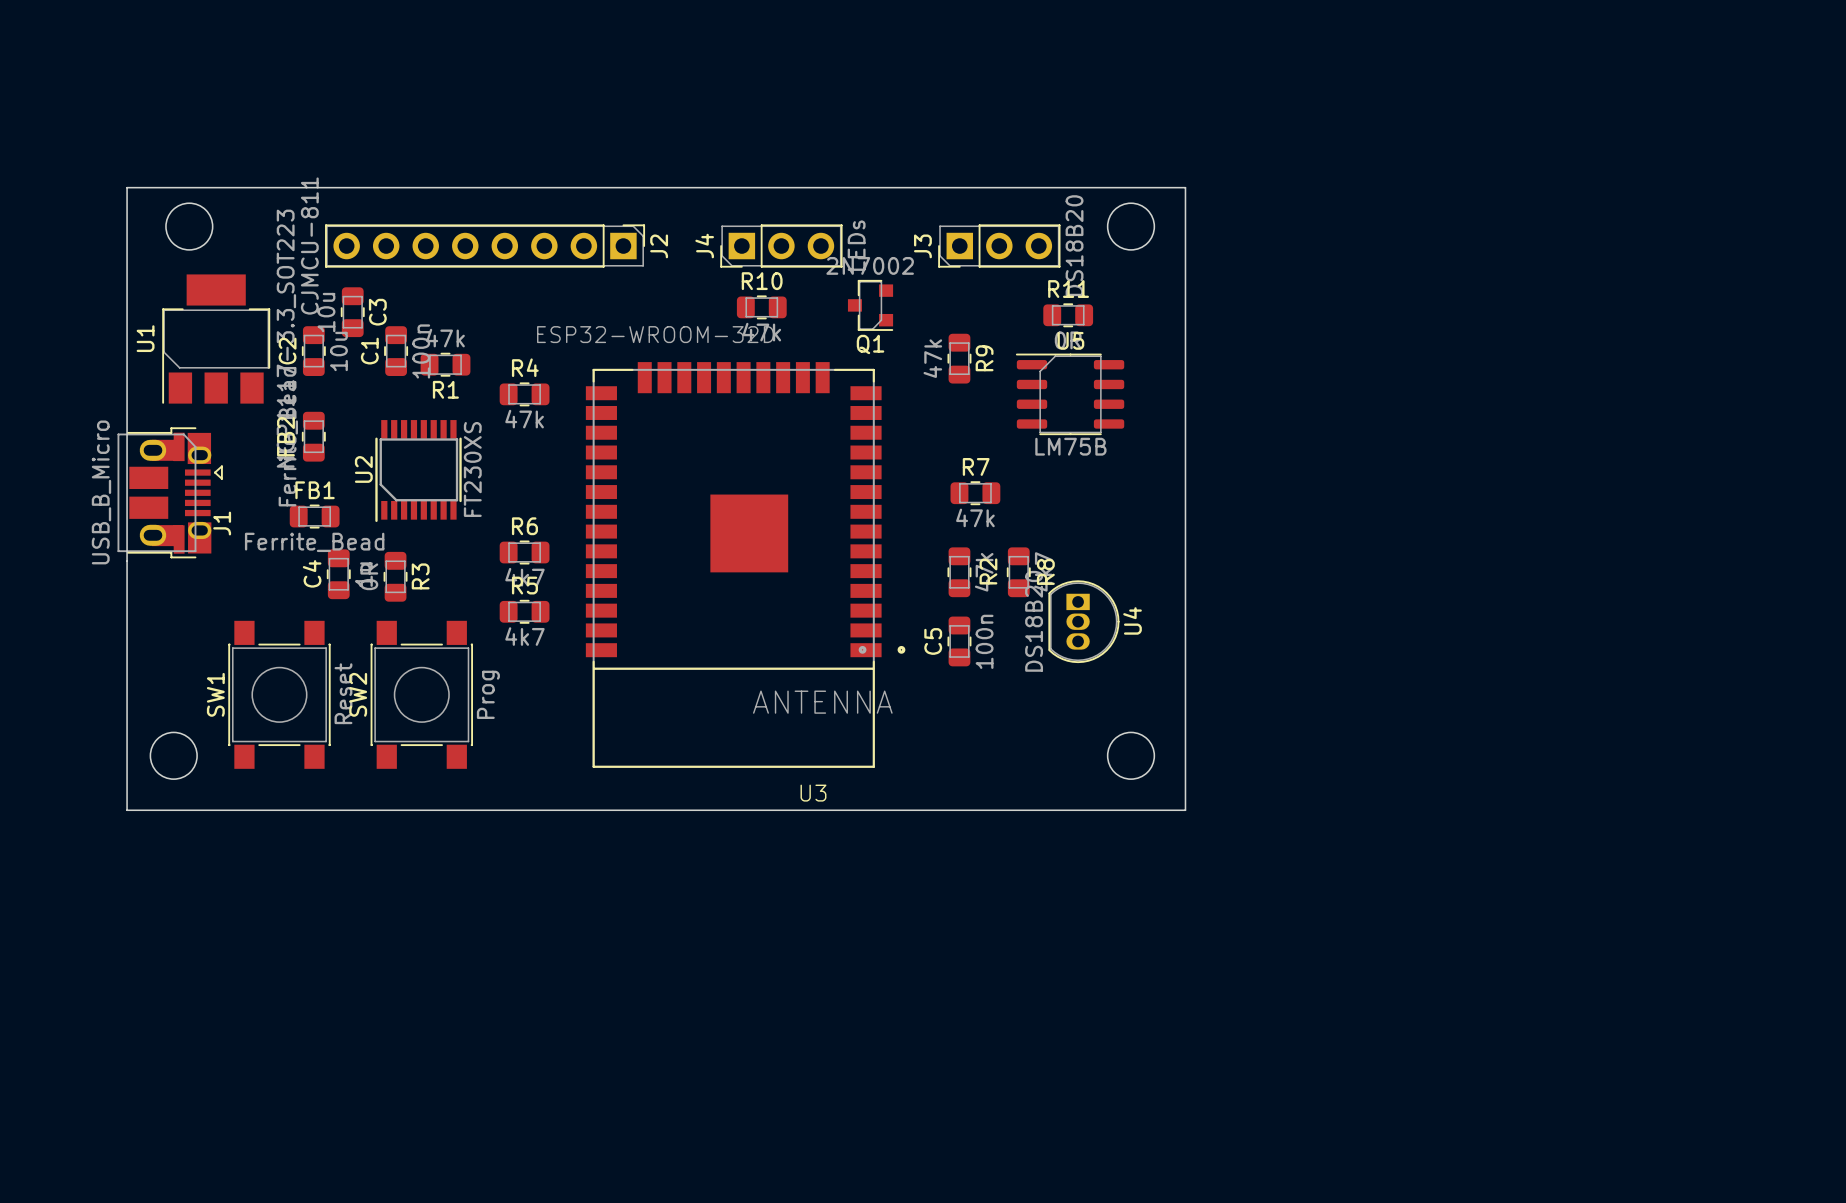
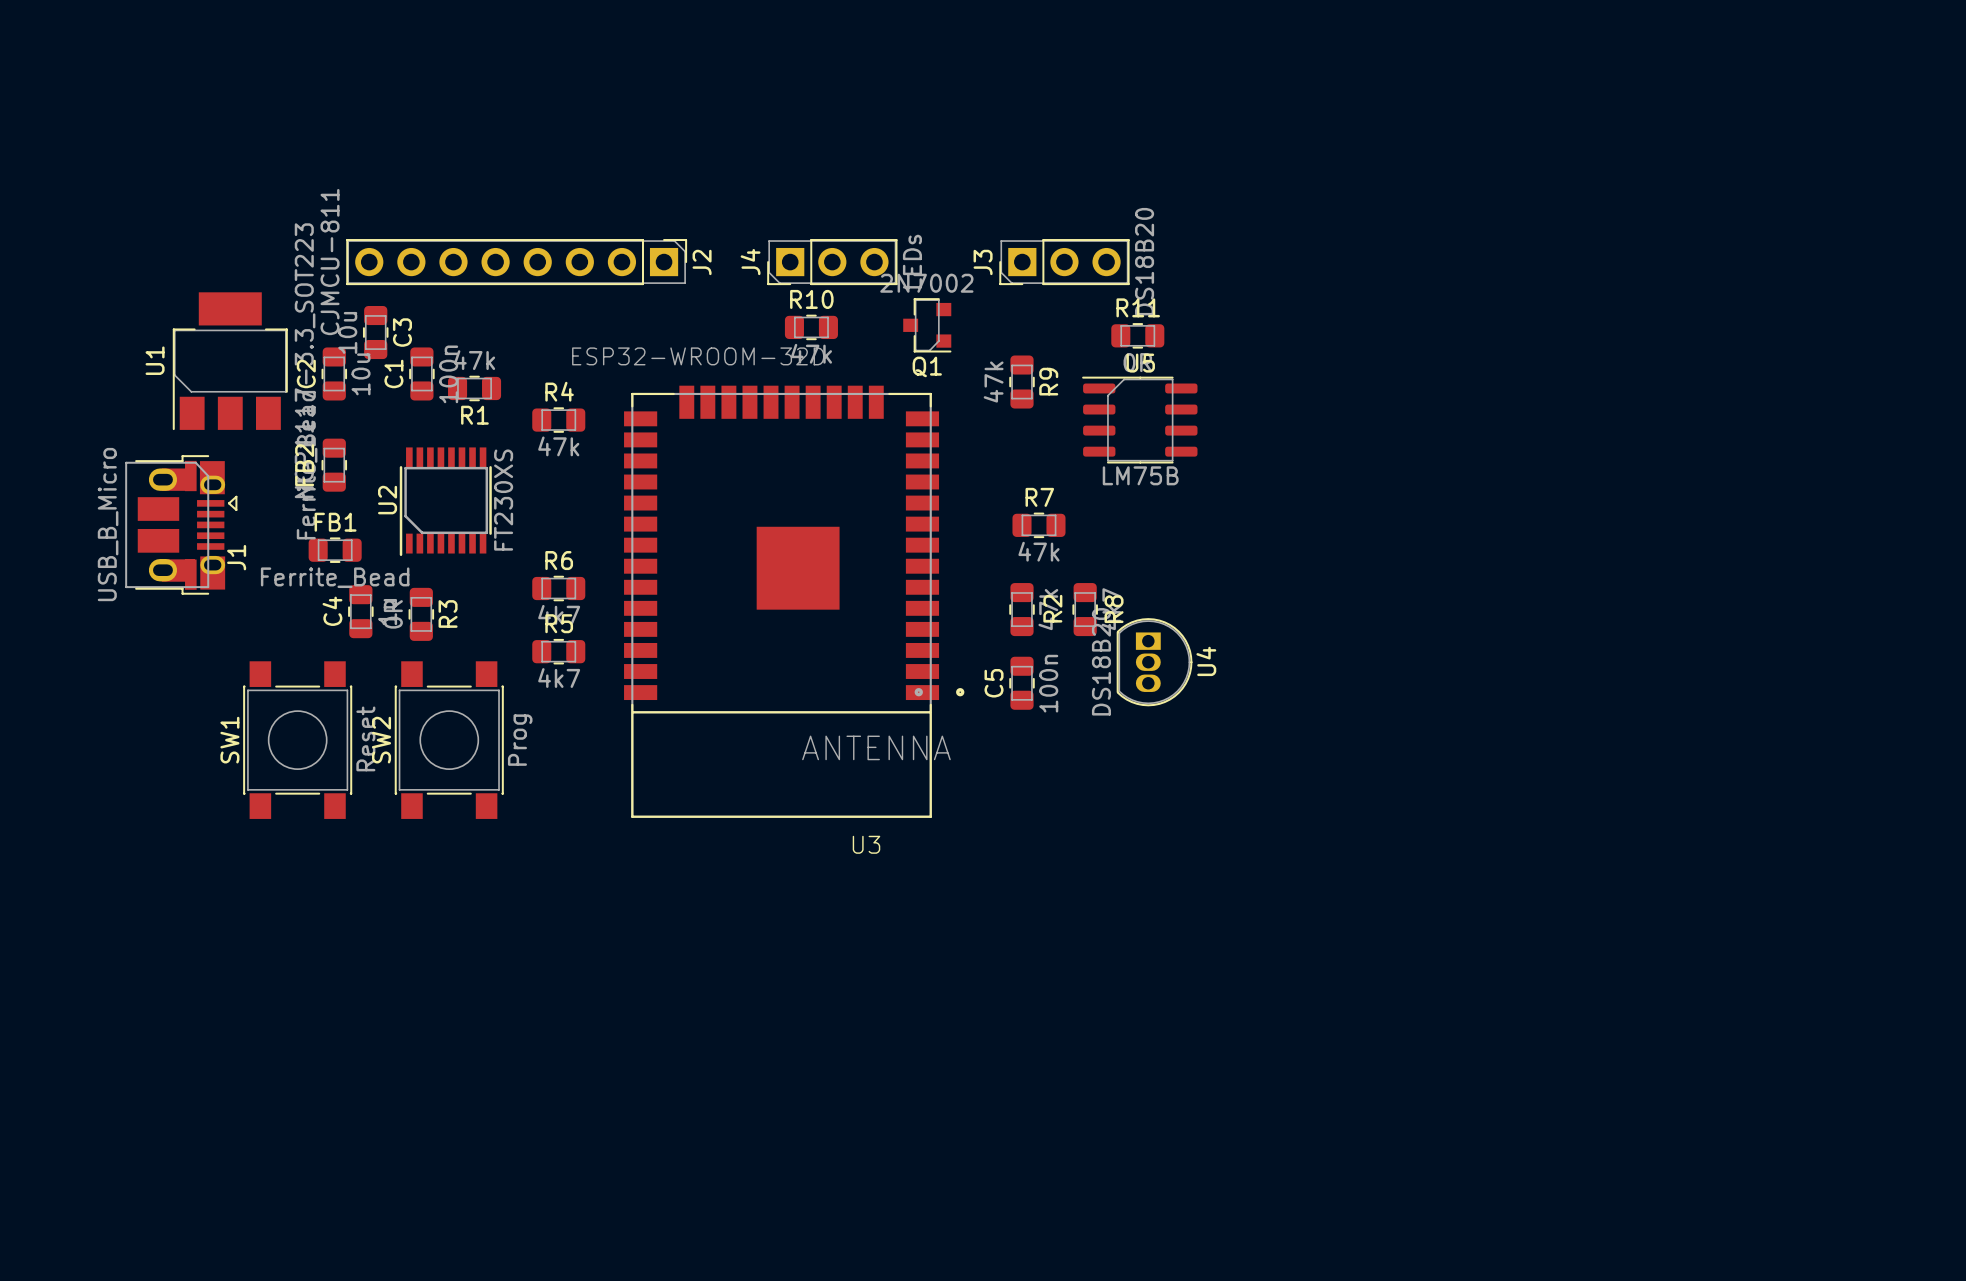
board edge: (127, 187) (127, 810) (1185, 810) (1185, 187) (127, 187) -> none
round board edge: [165, 202, 214, 251] -> none
round board edge: [1107, 202, 1155, 251] -> none
round board edge: [150, 732, 198, 780] -> none
round board edge: [1107, 732, 1155, 780] -> none

